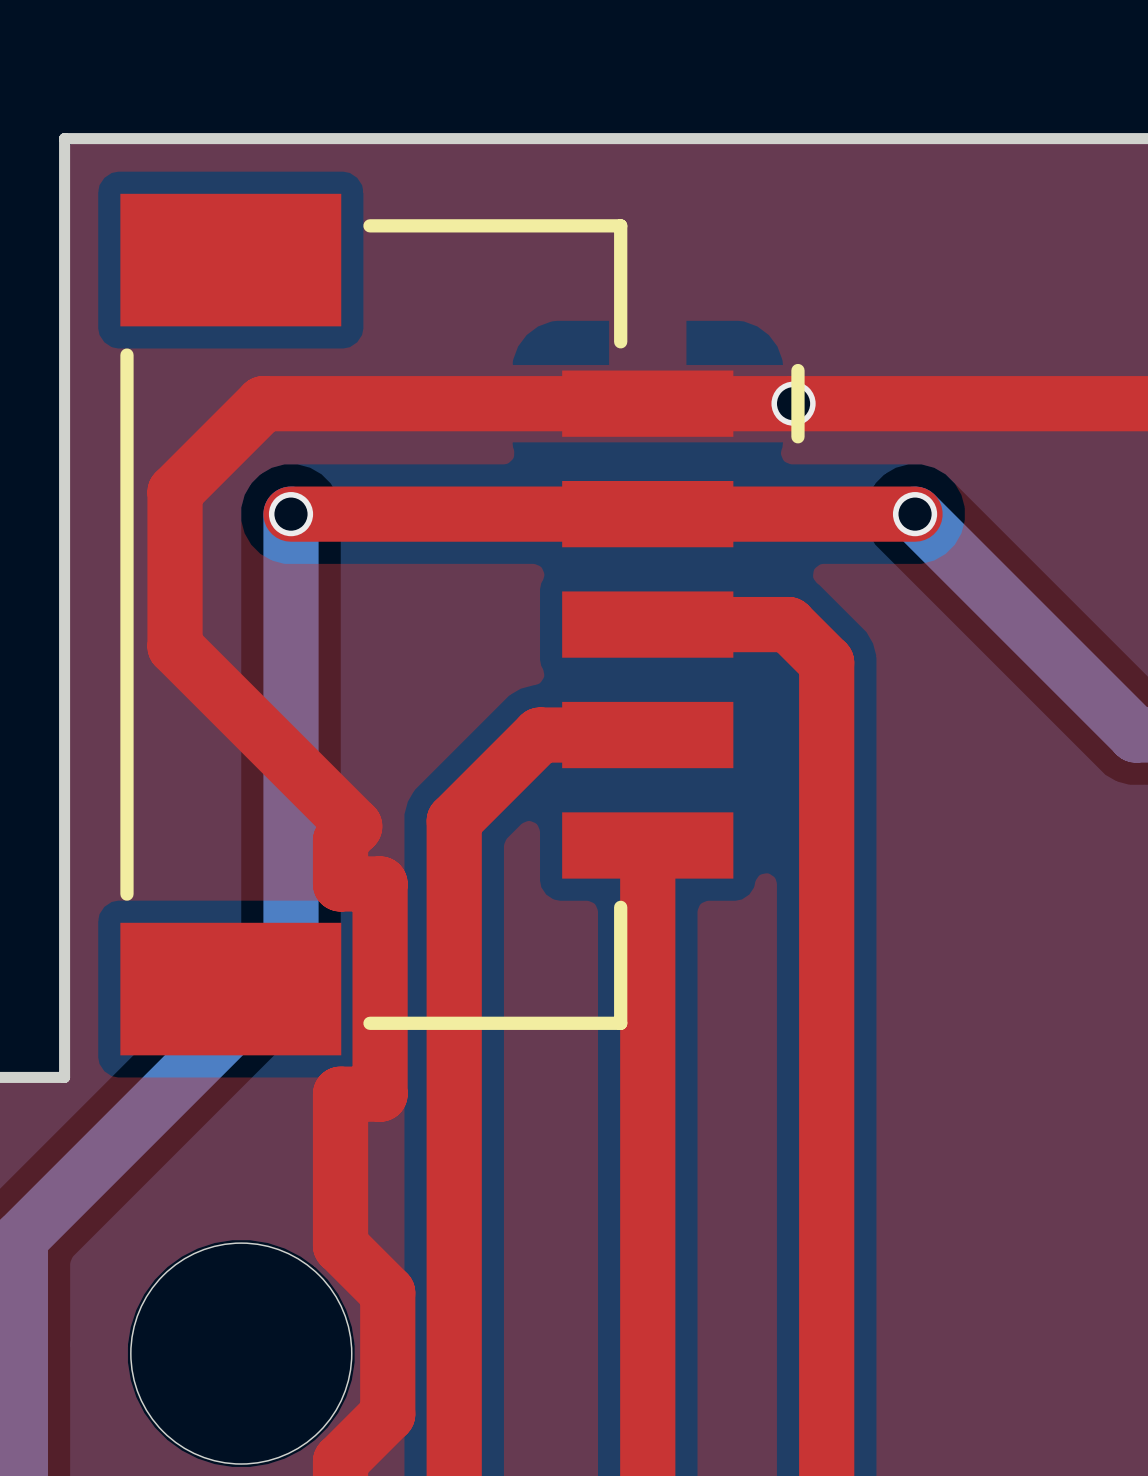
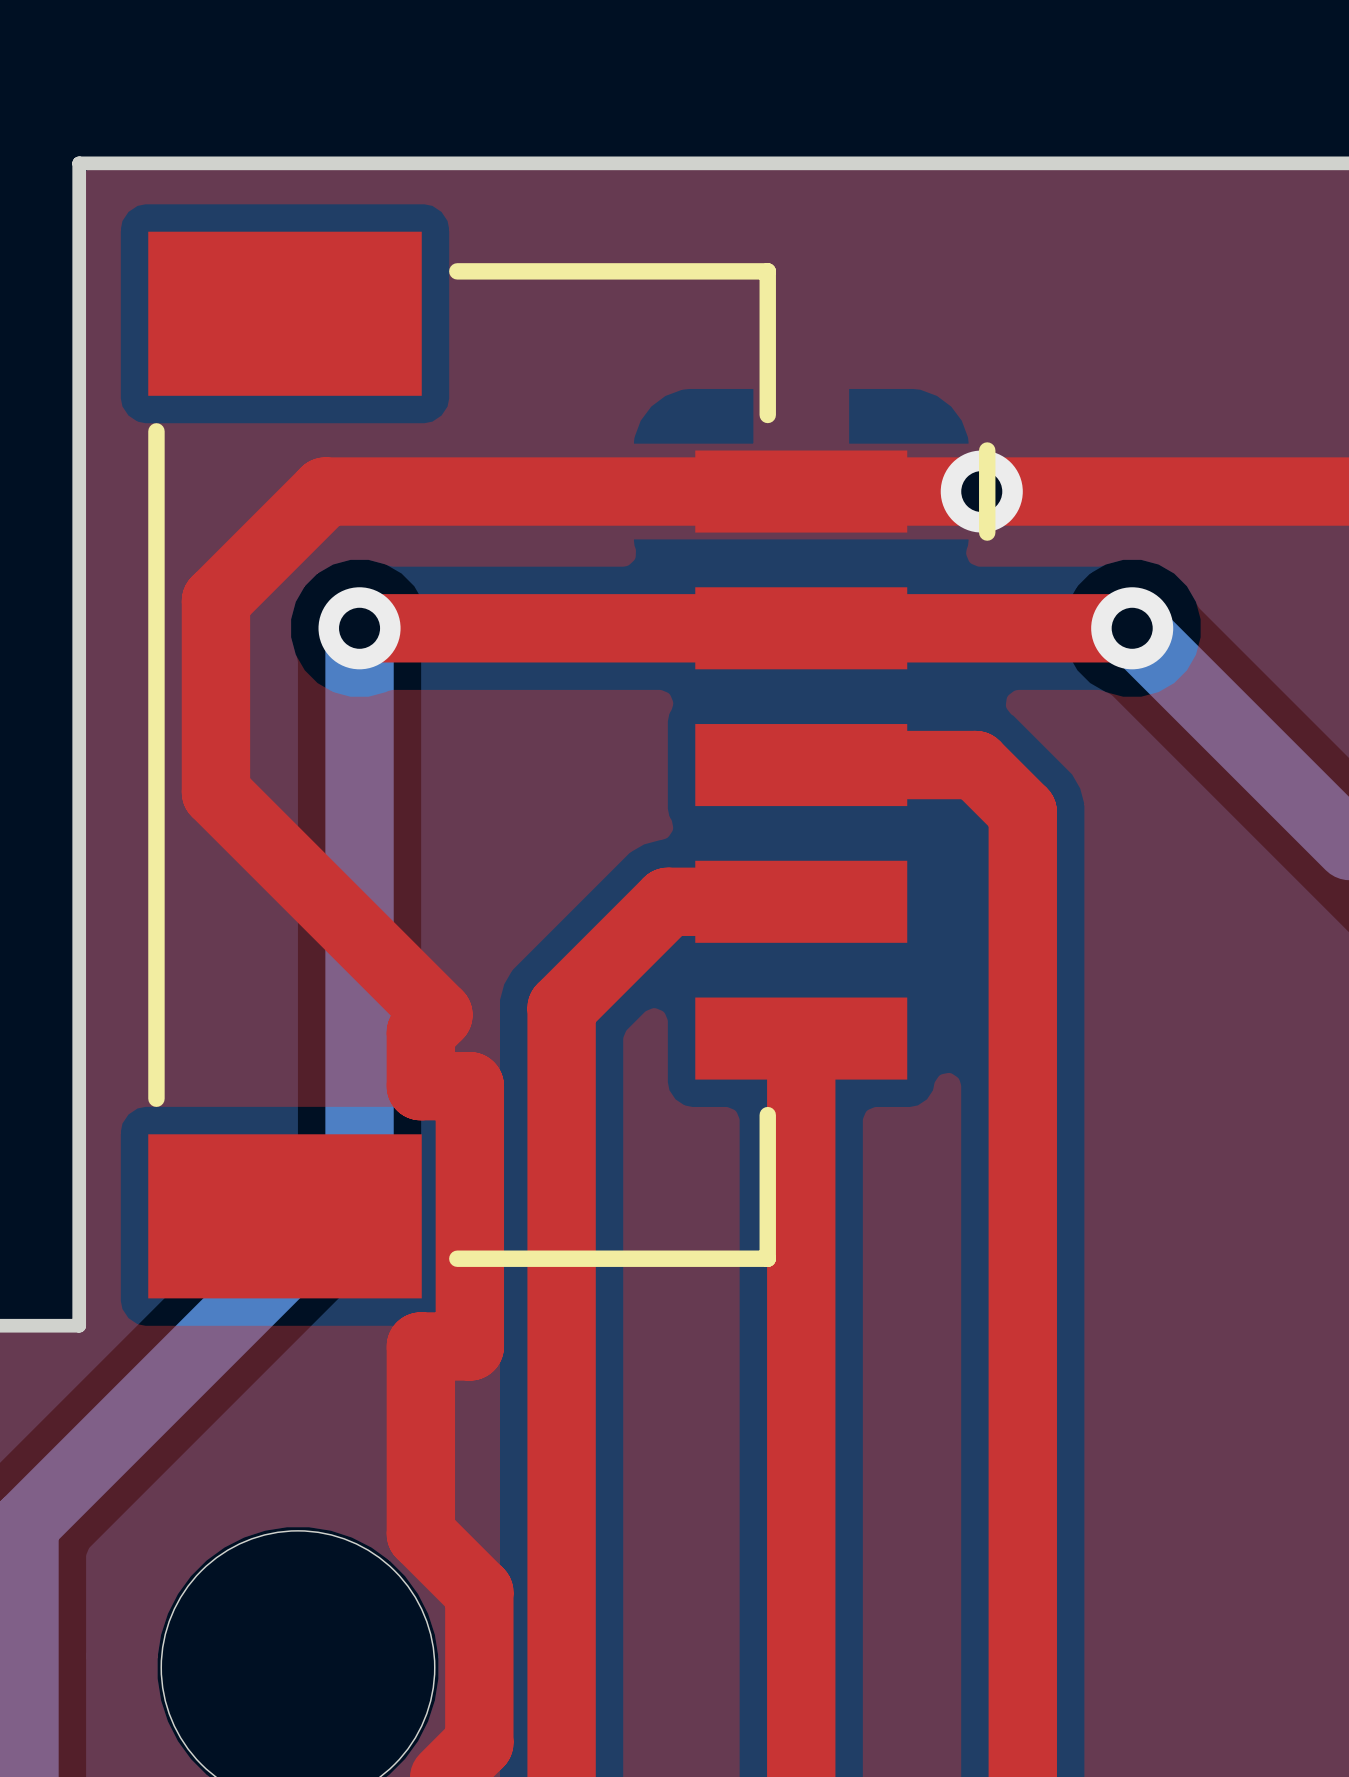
via size: [771, 381, 816, 426] -> [940, 450, 1023, 533]
via size: [268, 492, 314, 537] -> [318, 587, 401, 670]
via size: [892, 492, 938, 537] -> [1091, 587, 1174, 670]

